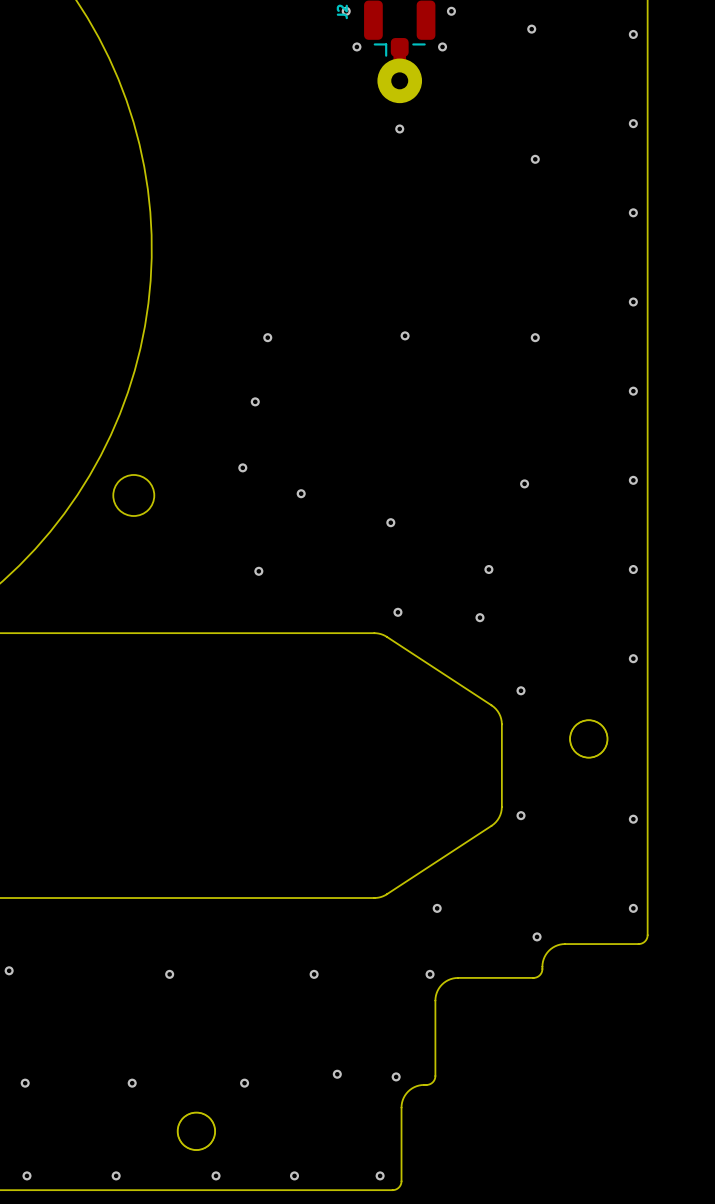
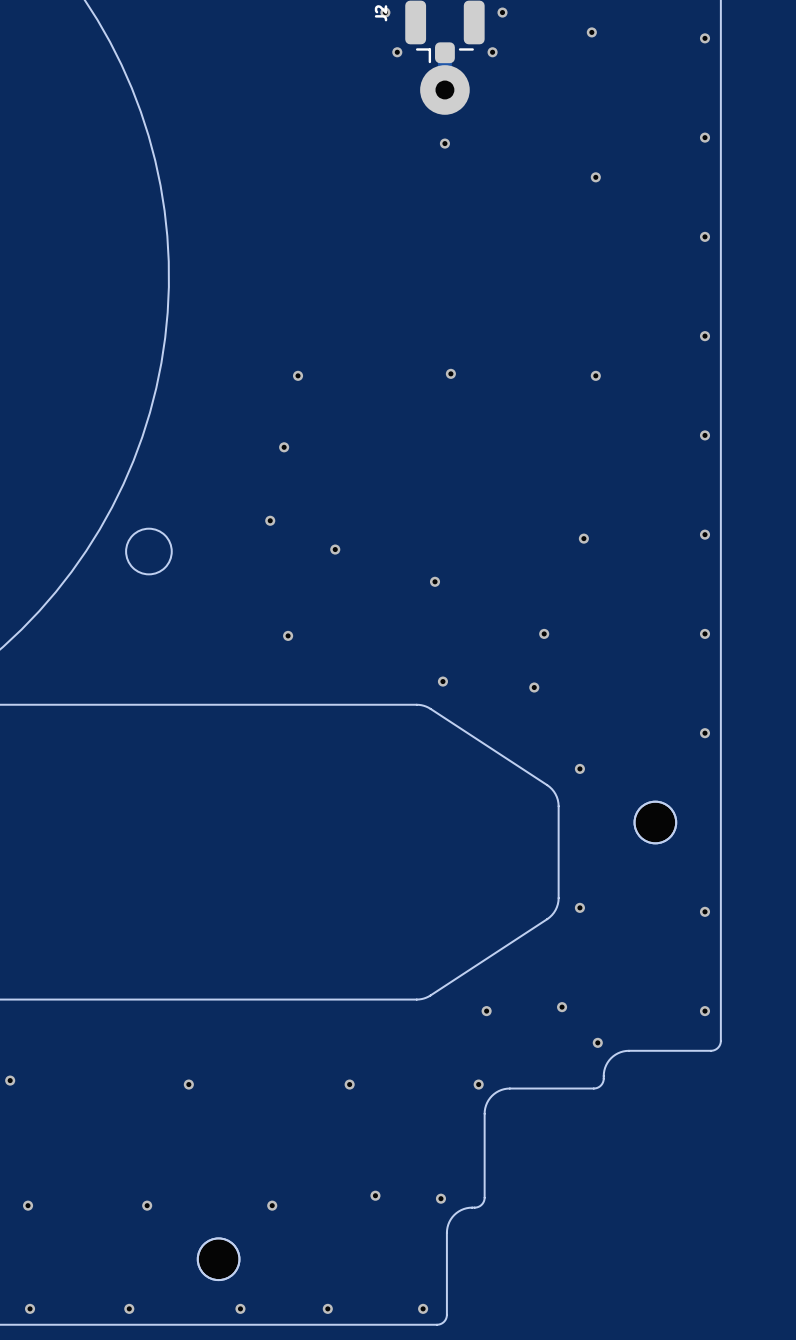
via: none -> (562, 1007)

